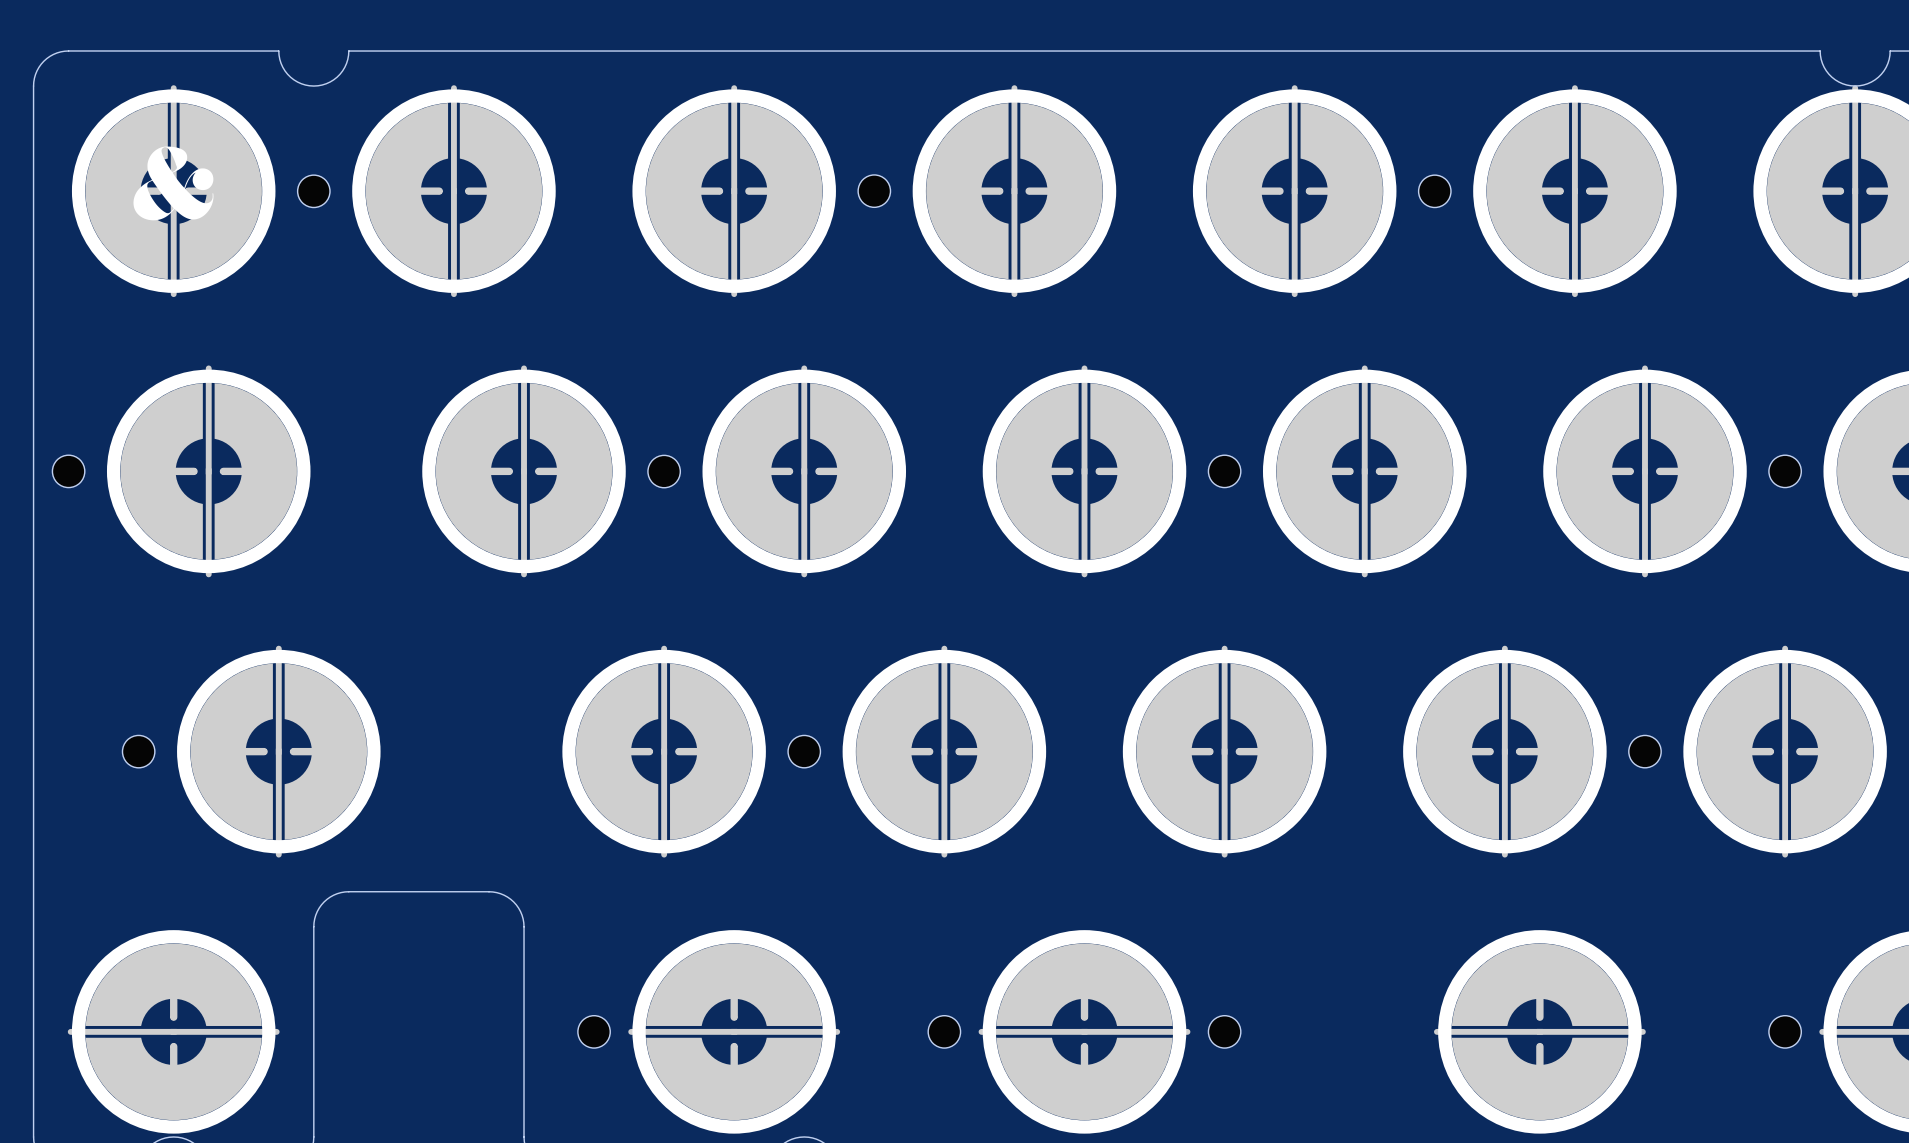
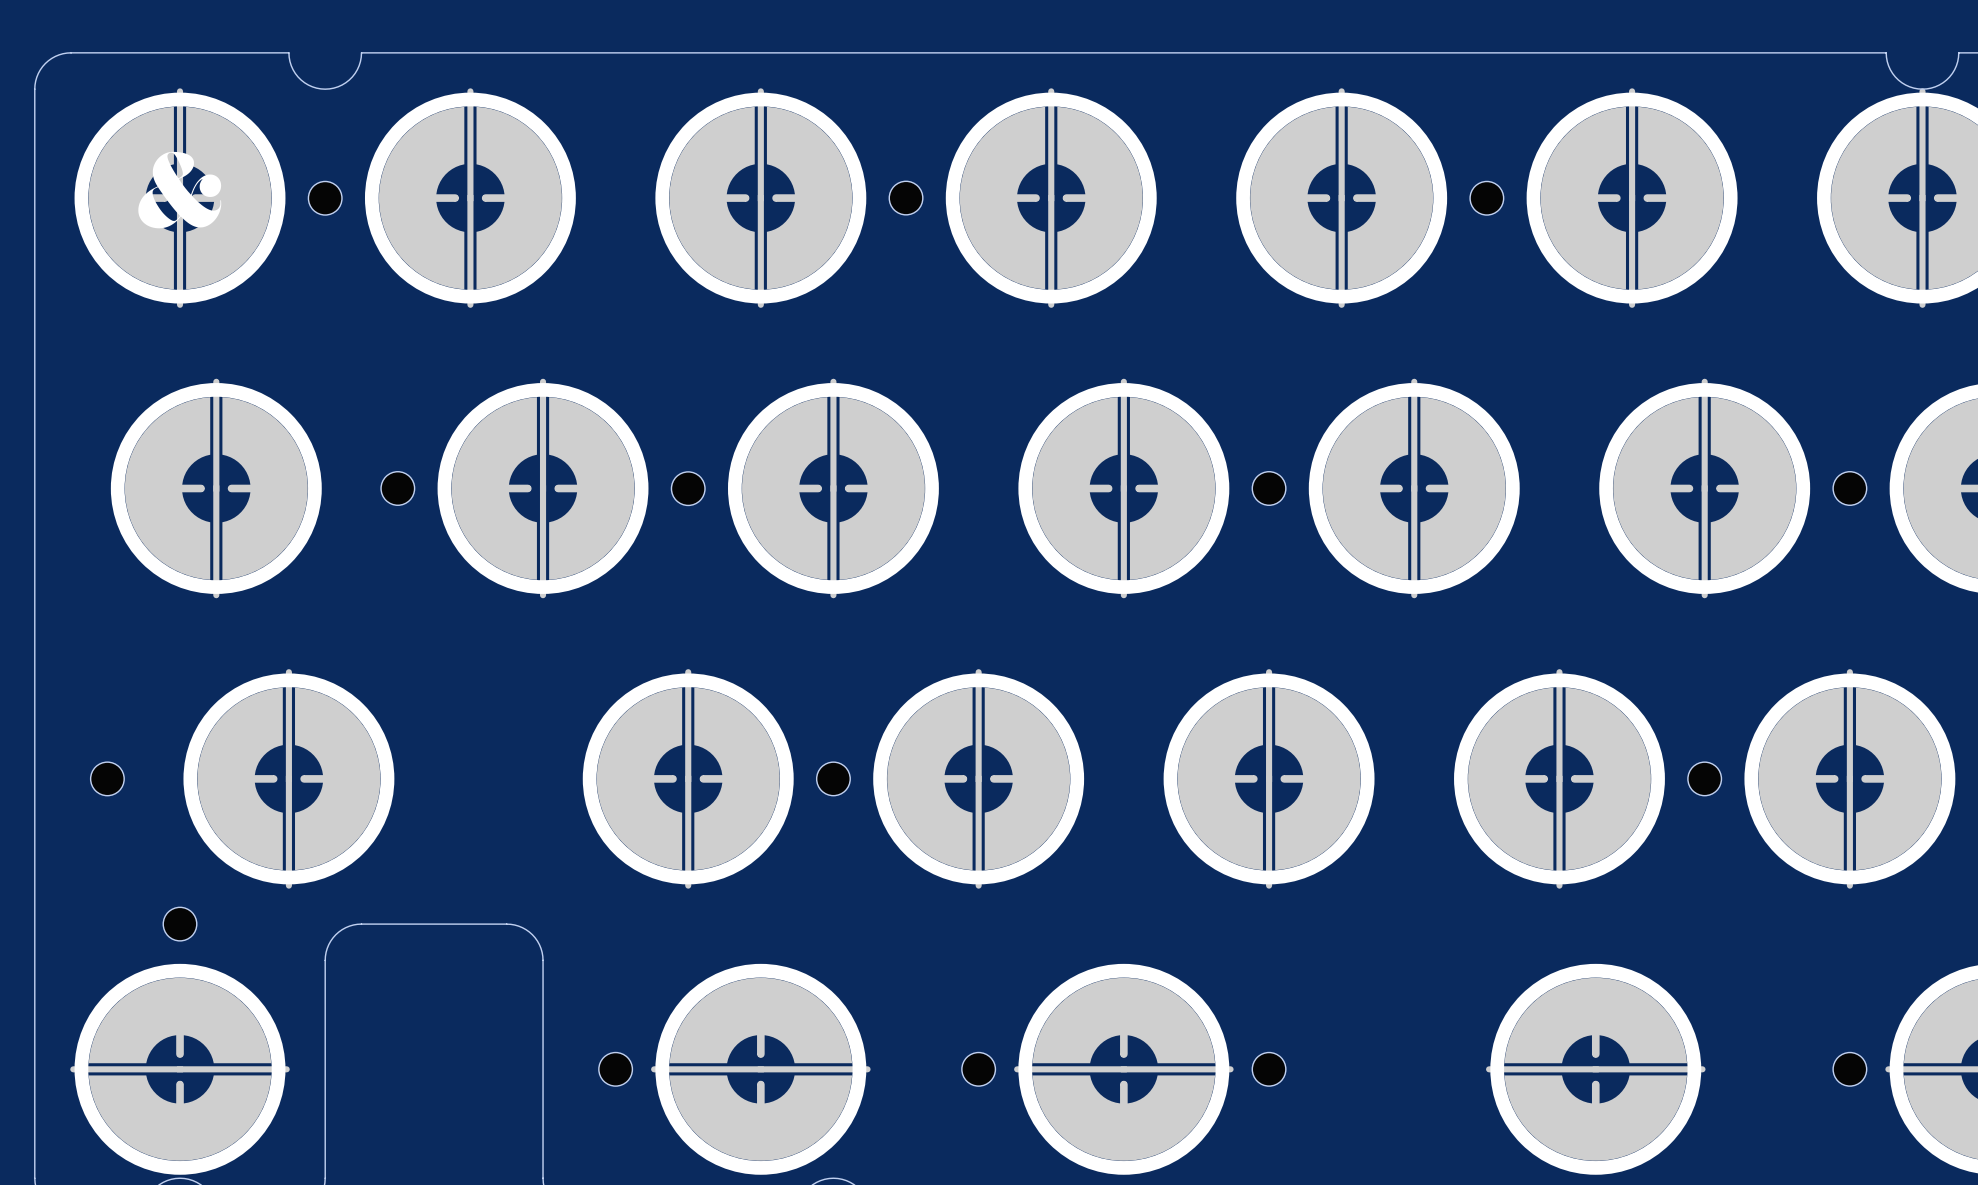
part: (68, 471) -> none
part: none -> (397, 488)
part position: (138, 751) -> (107, 778)
part: none -> (180, 924)

